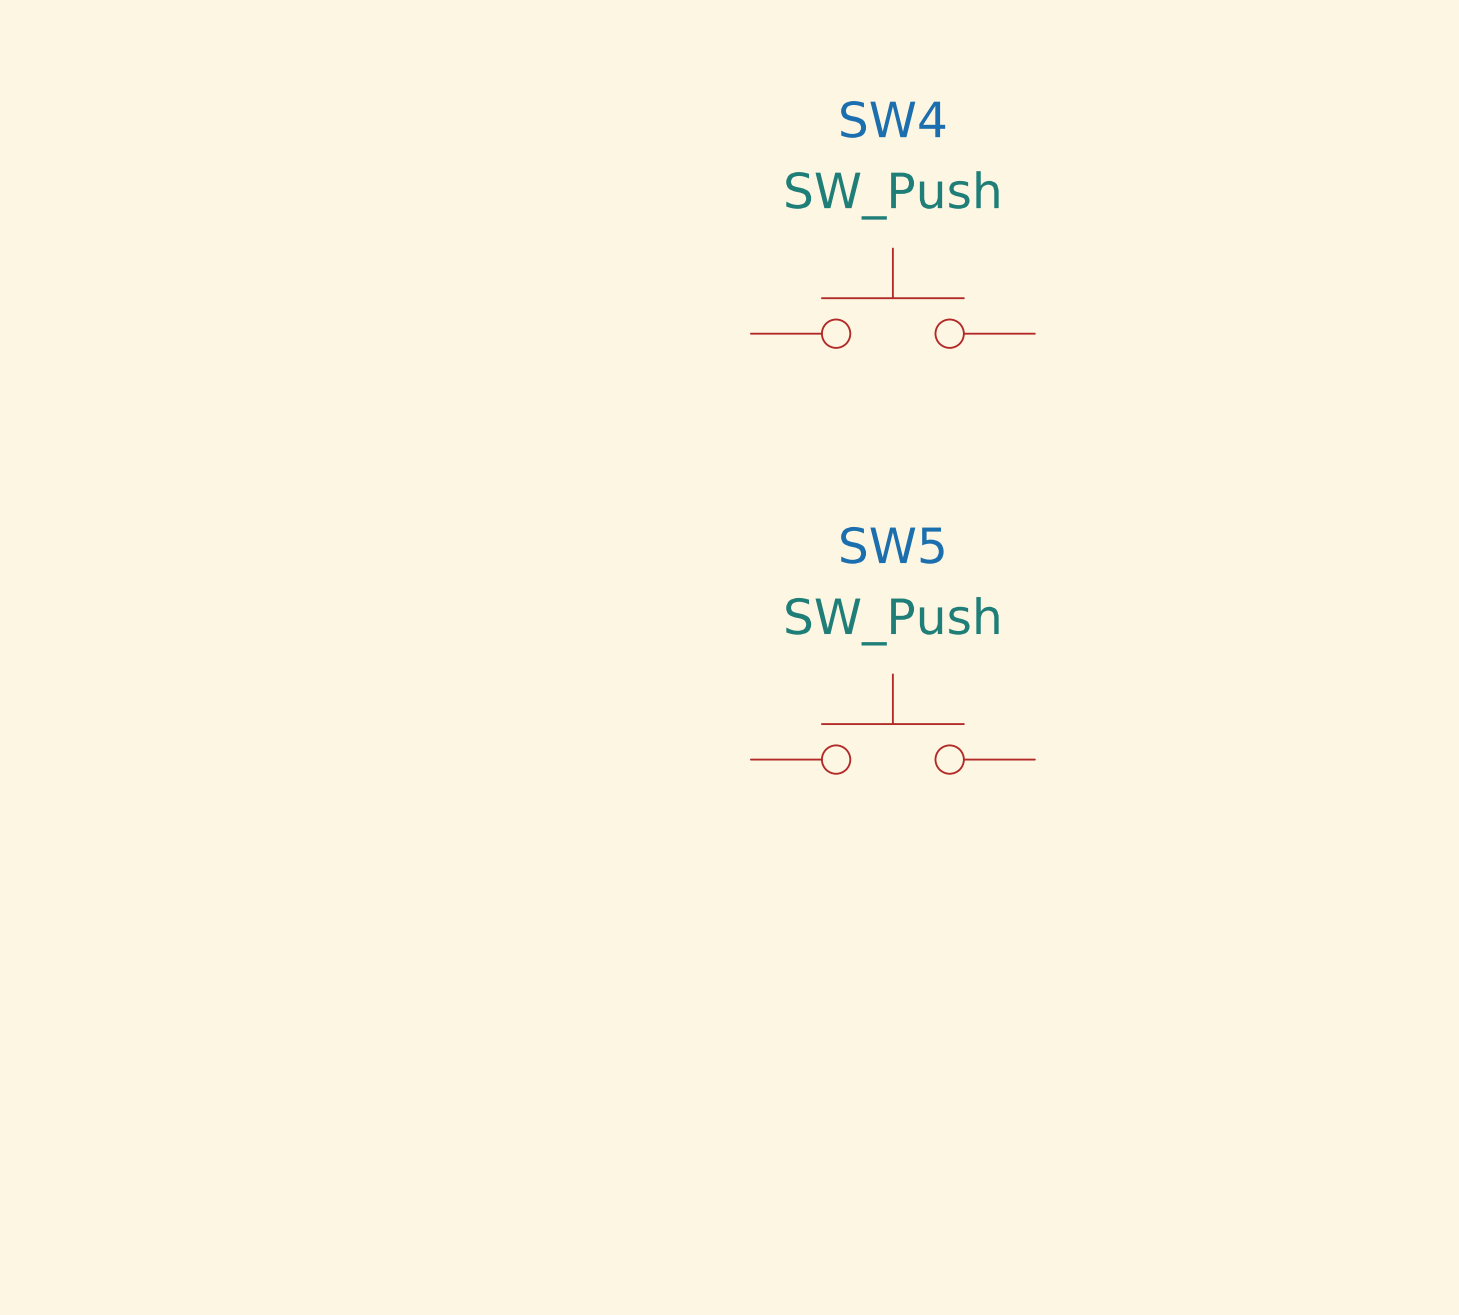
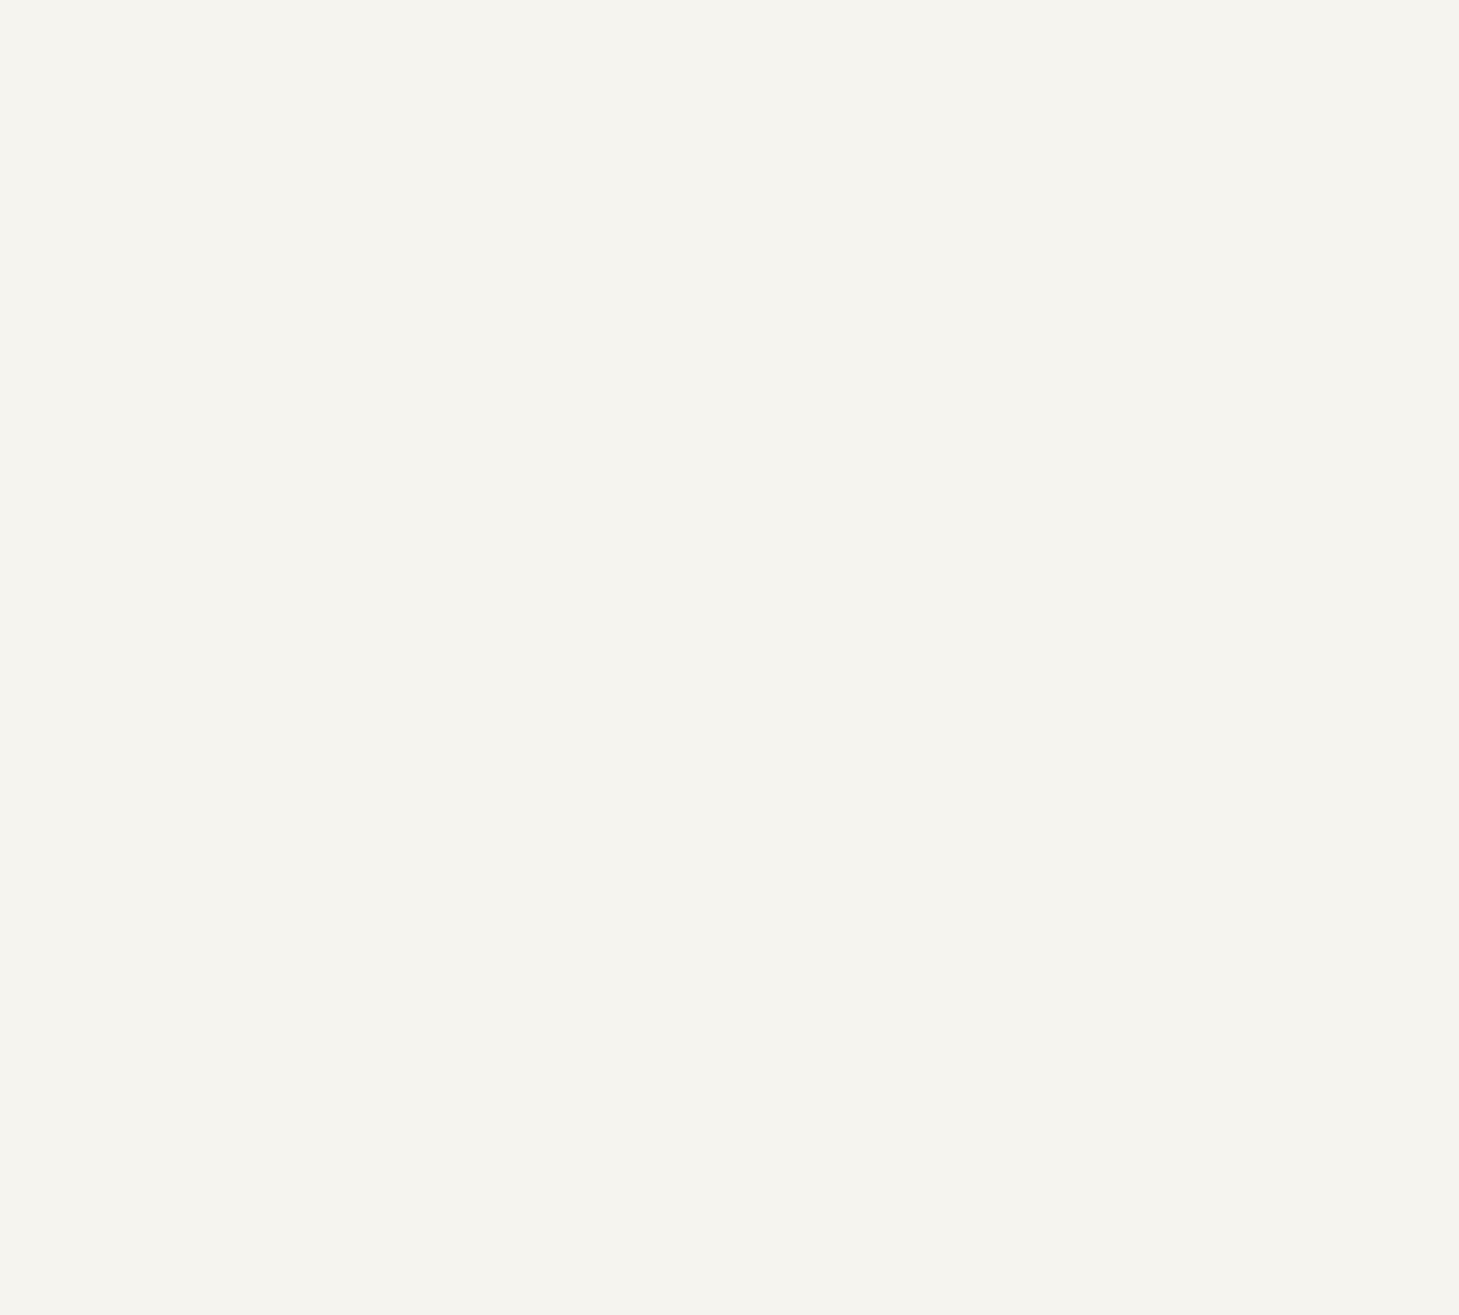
SW4: SW_Push (892, 298) -> none
SW5: SW_Push (892, 724) -> none

